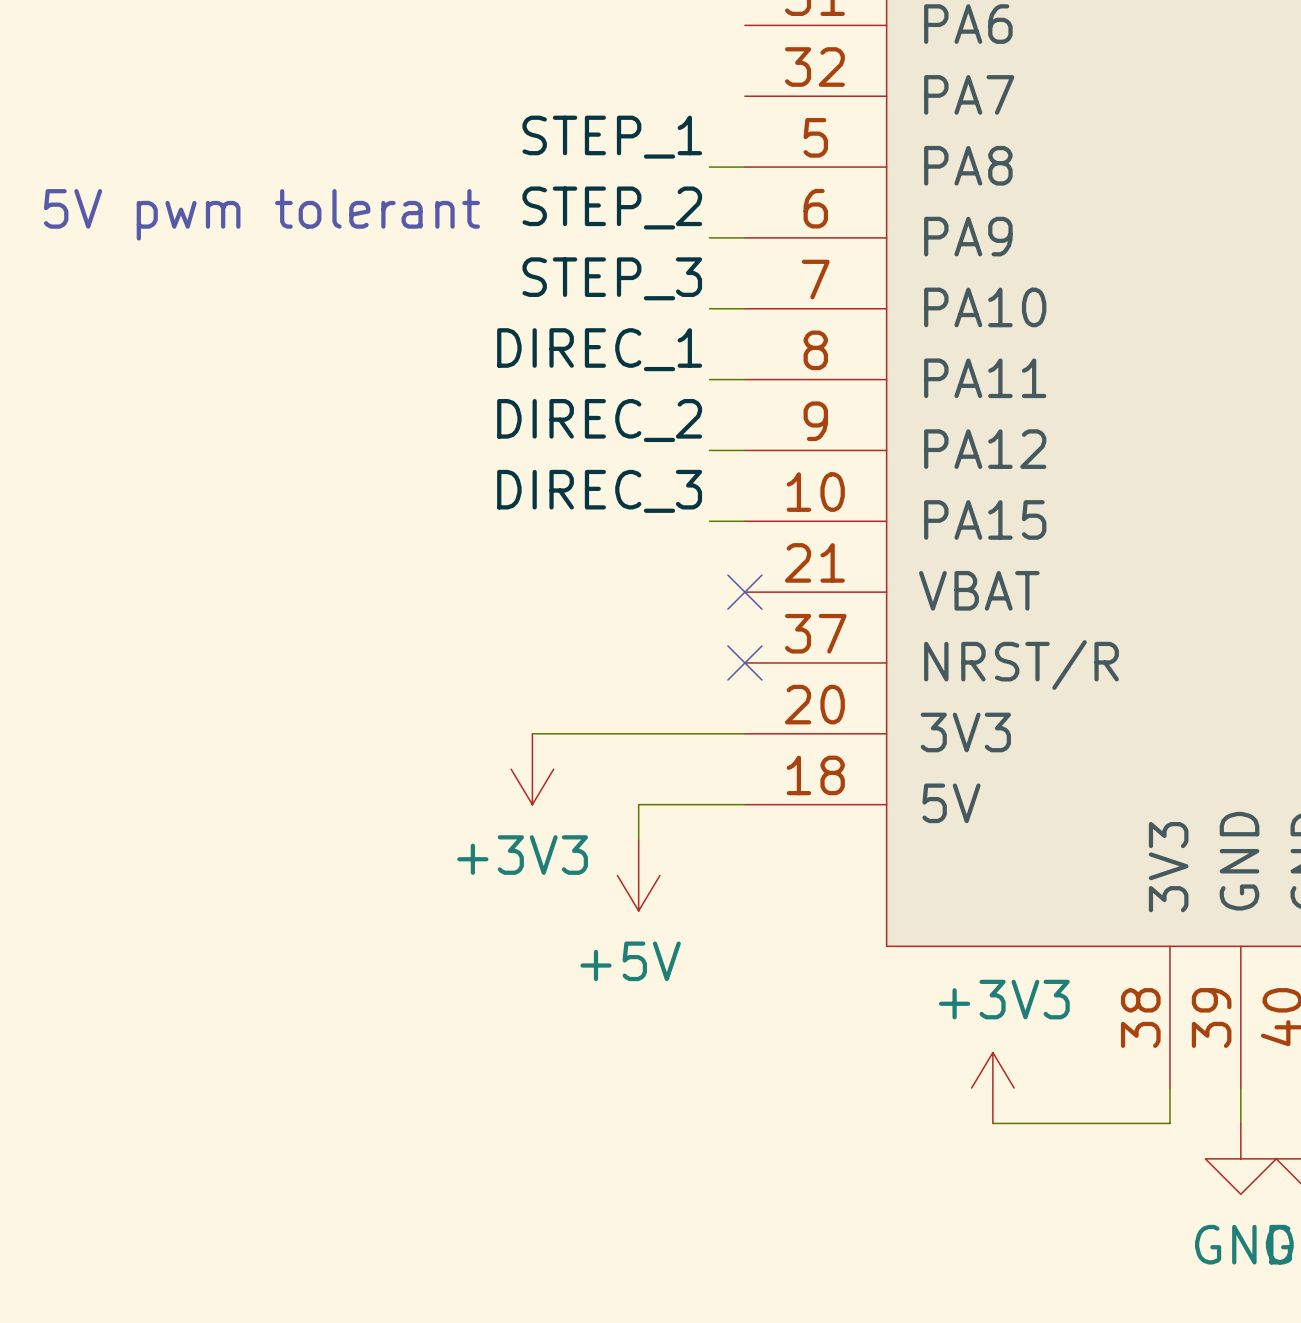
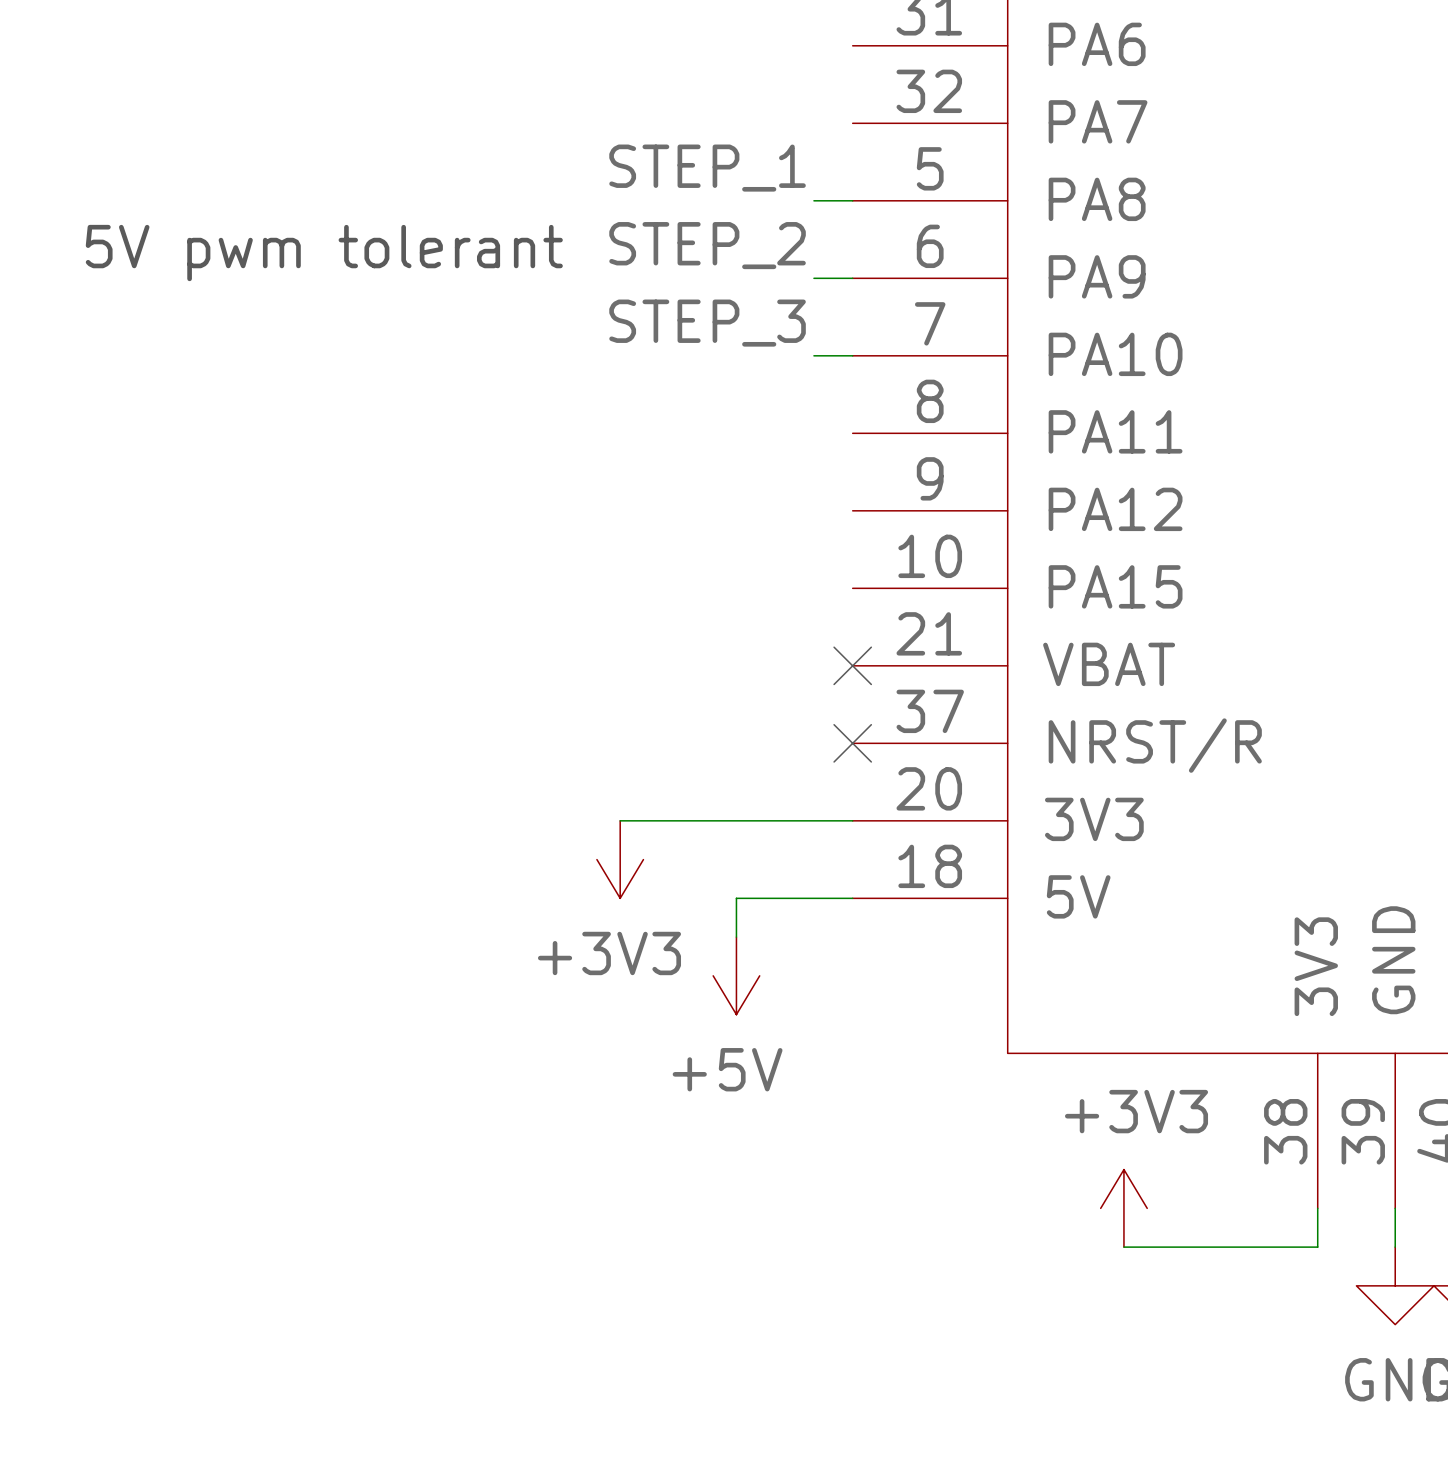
label: DIREC_1 (599, 349) -> none
wire: (709, 379) (744, 379) -> none
label: DIREC_2 (599, 420) -> none
wire: (709, 450) (744, 450) -> none
label: DIREC_3 (599, 491) -> none
wire: (709, 521) (744, 521) -> none

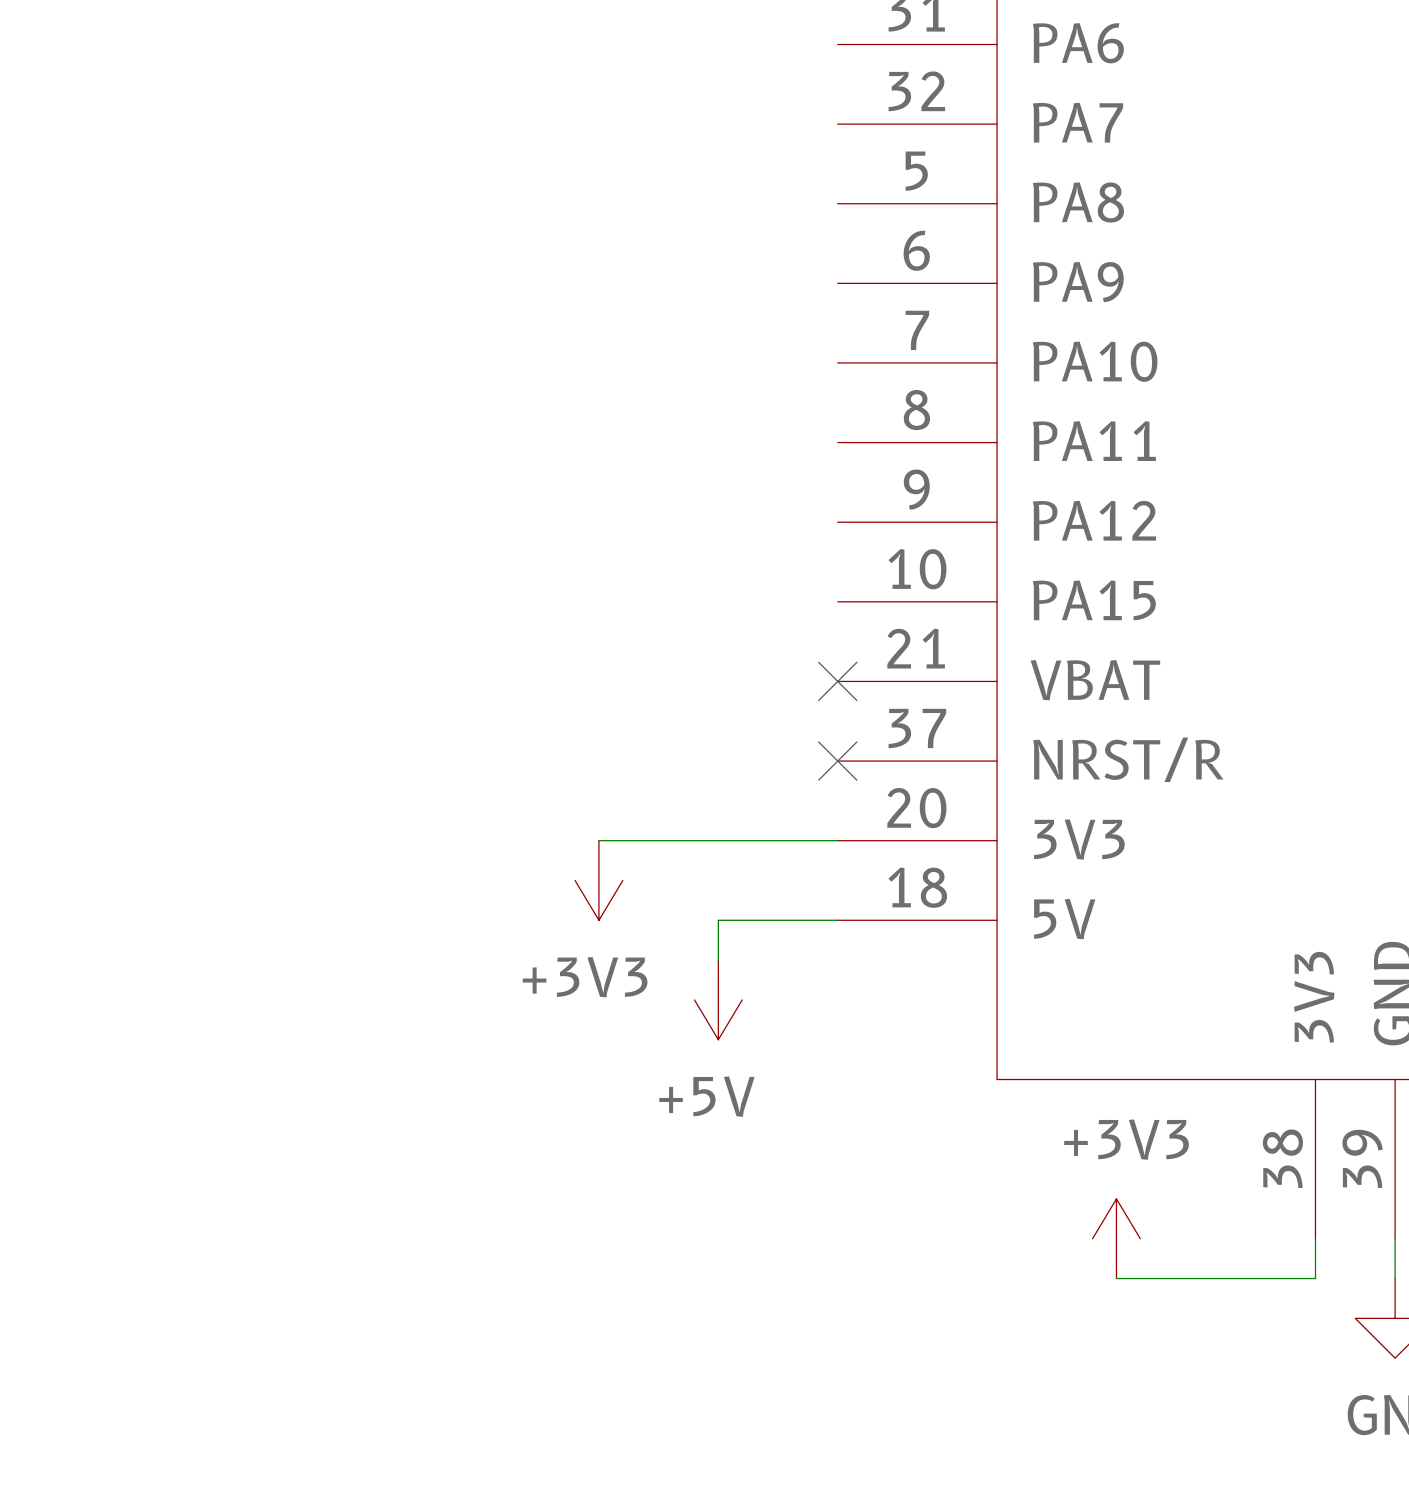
label: STEP_1 (707, 168) -> none
wire: (813, 200) (852, 200) -> none
label: STEP_2 (707, 245) -> none
text: 5V pwm tolerant (324, 253) -> none
wire: (813, 278) (852, 278) -> none
label: STEP_3 (707, 323) -> none
wire: (813, 355) (852, 355) -> none

